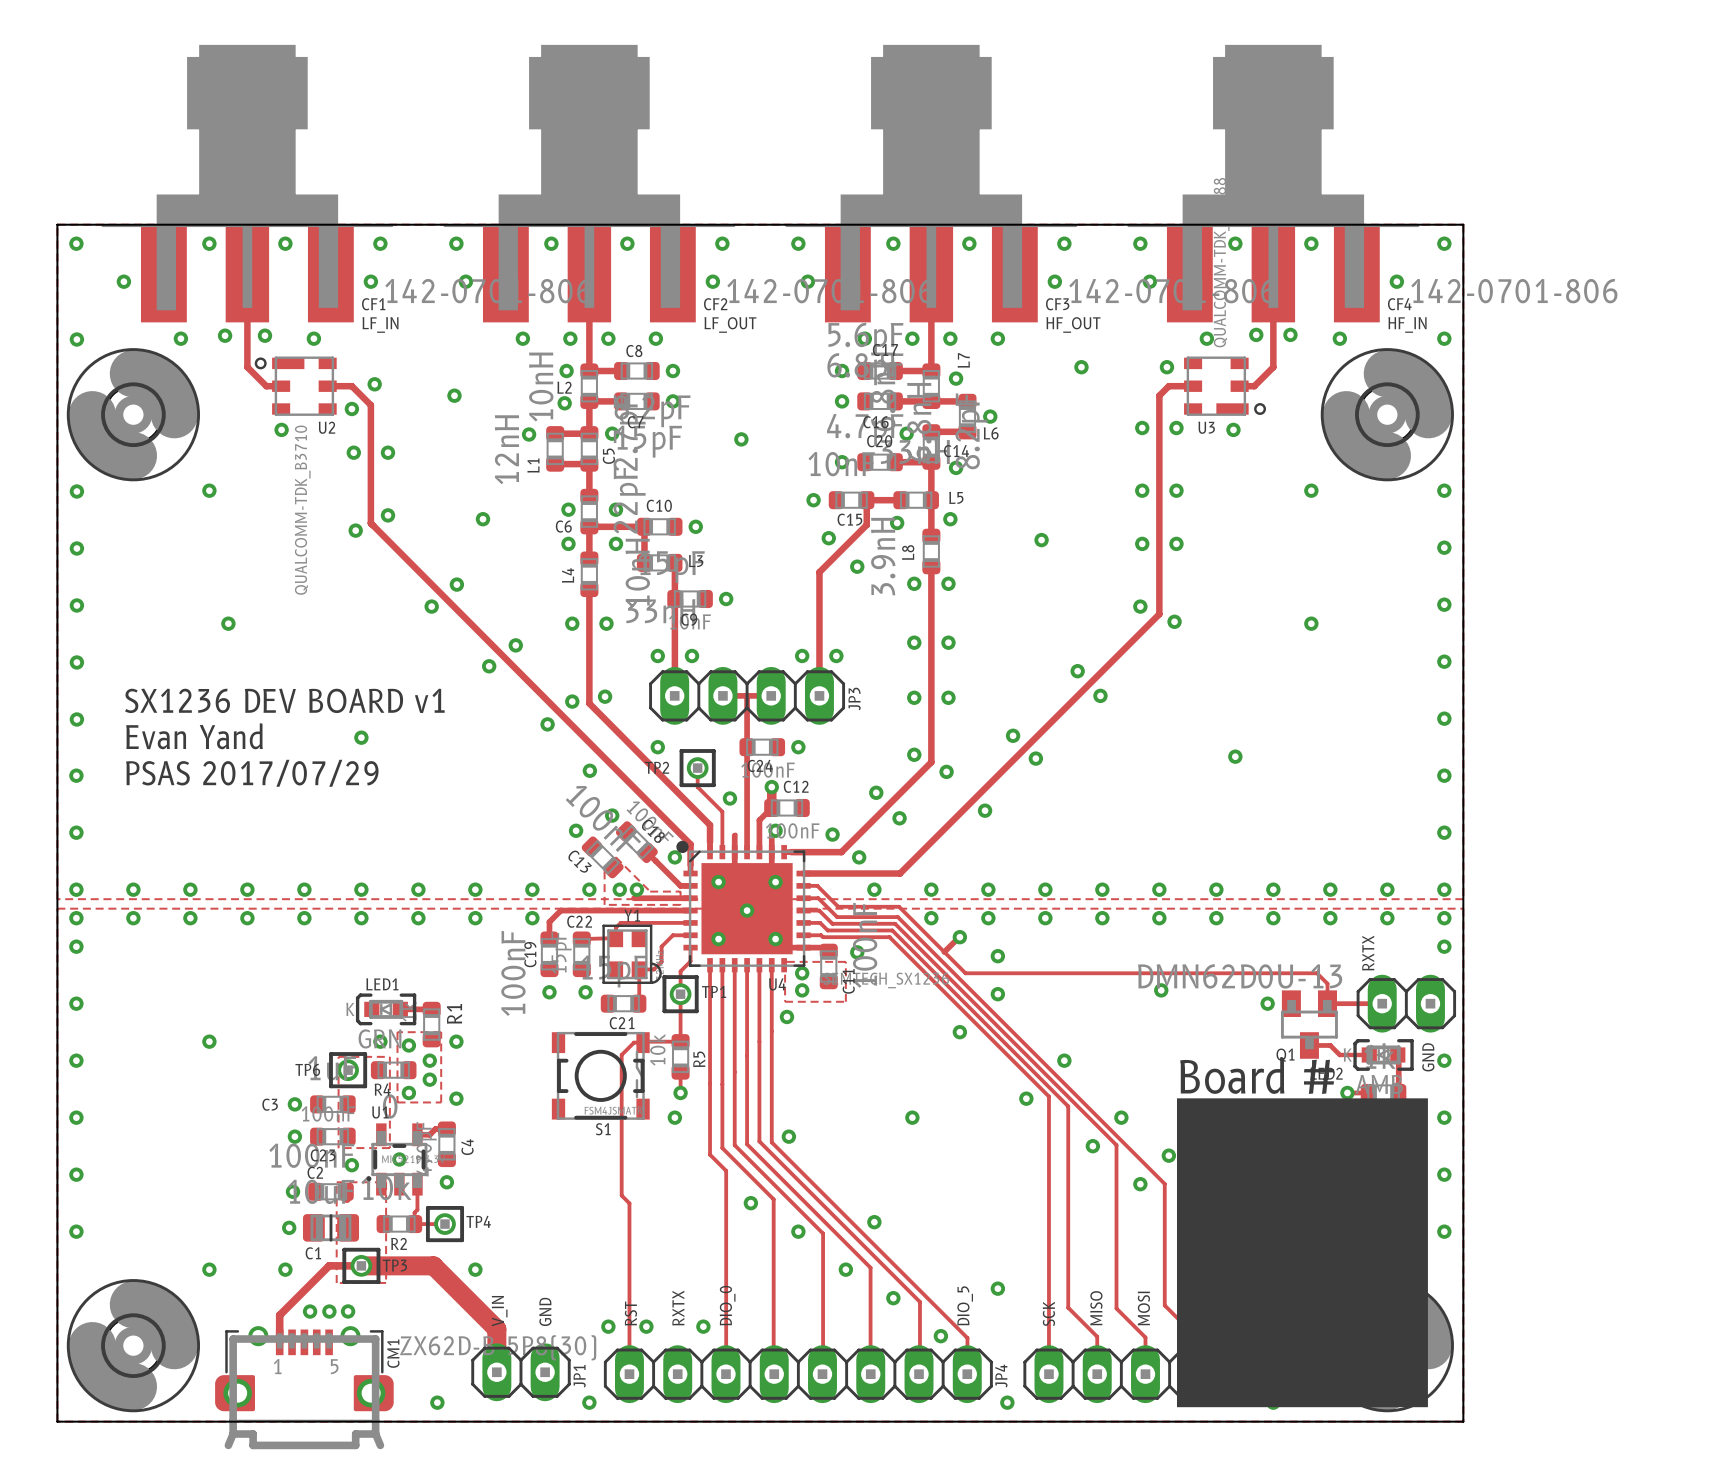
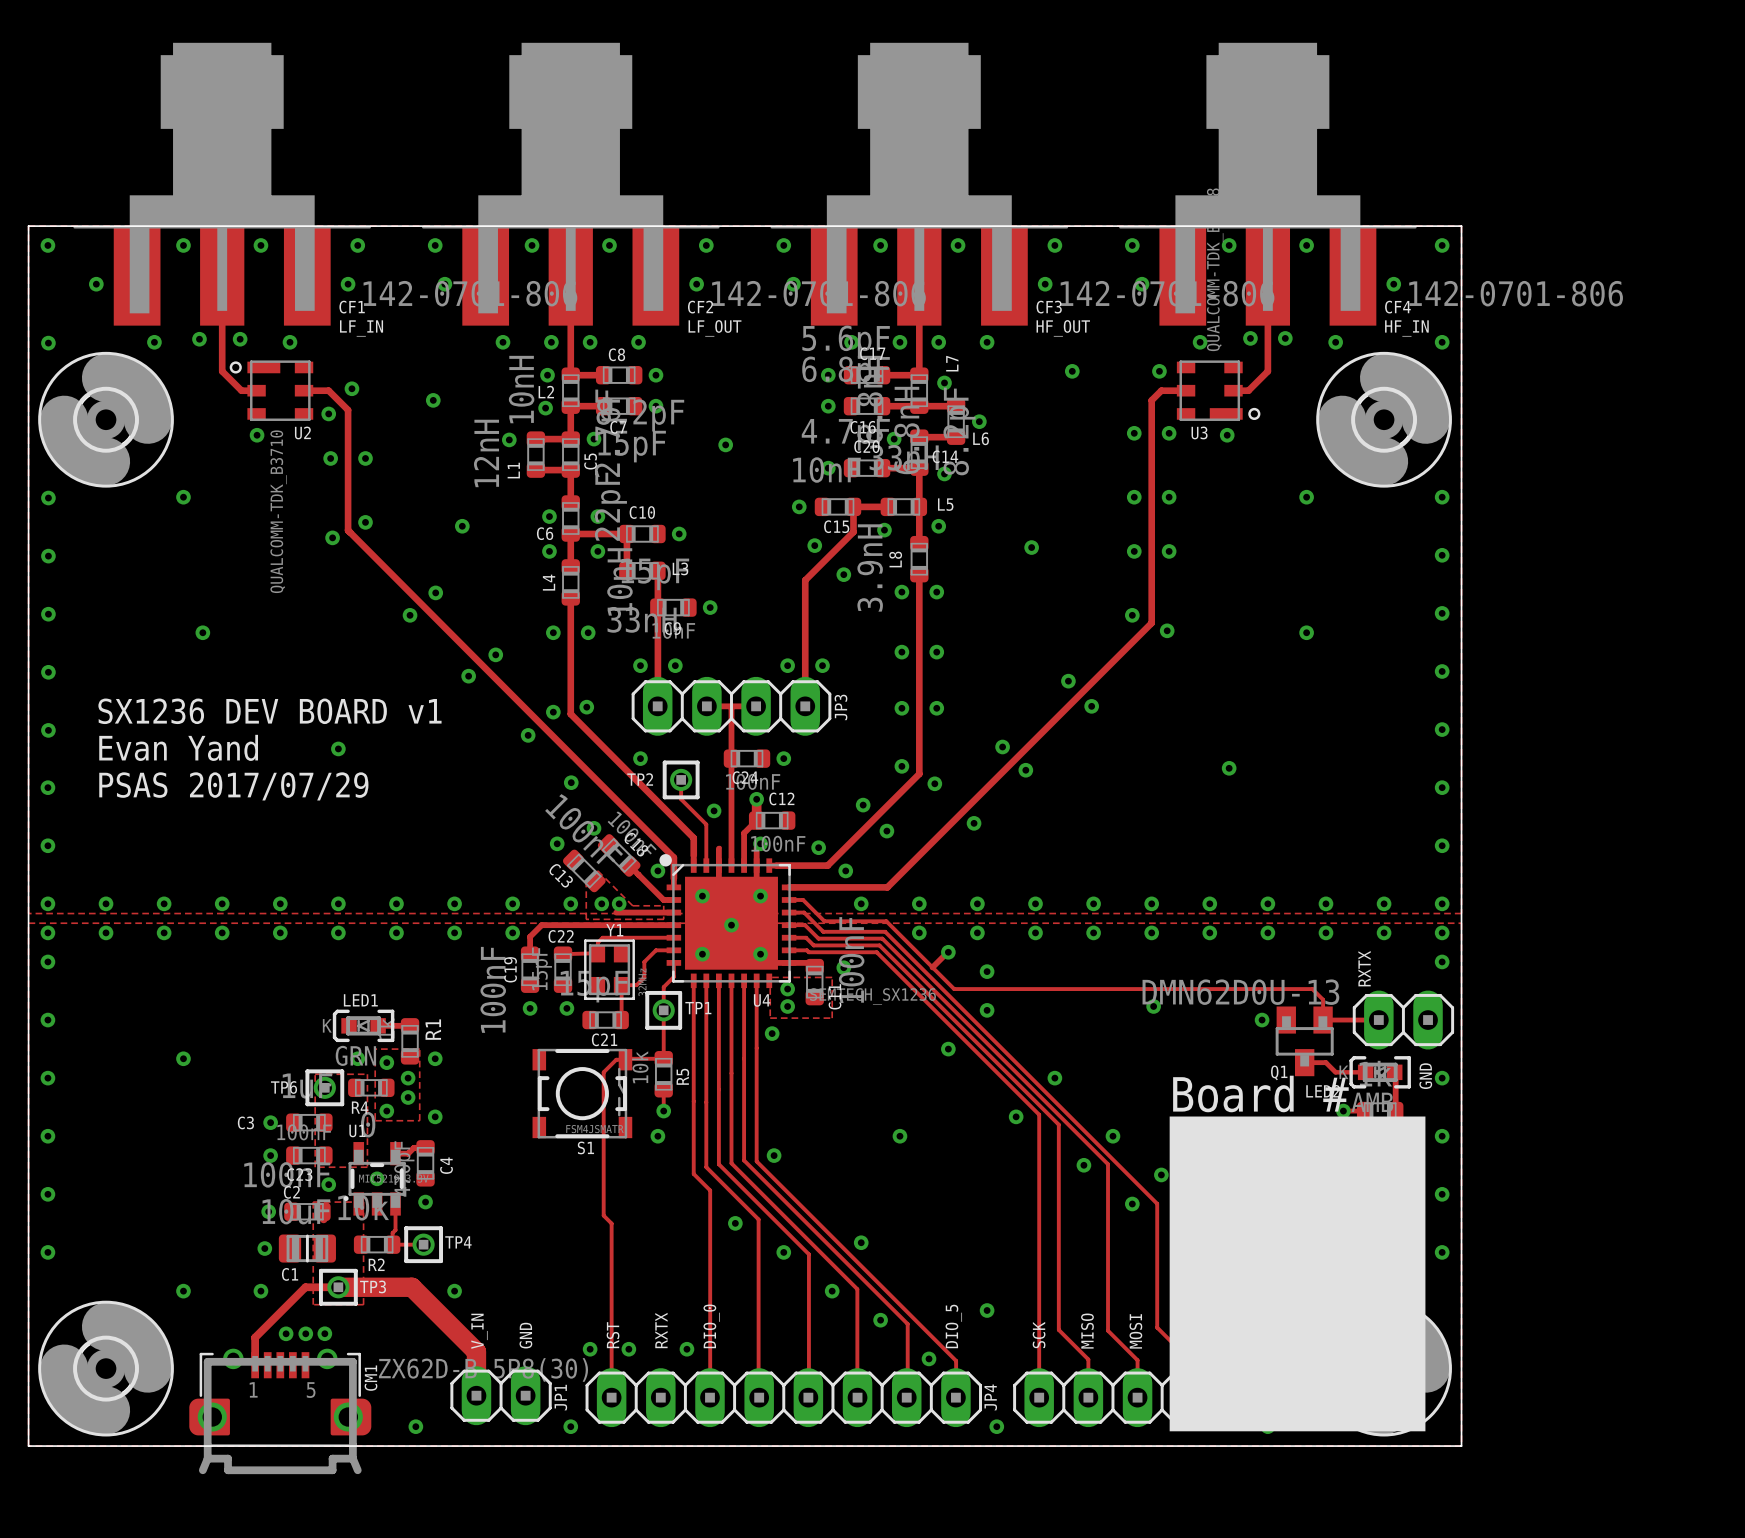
Y1 footprint: [602, 924, 662, 984] -> [584, 939, 635, 1000]

